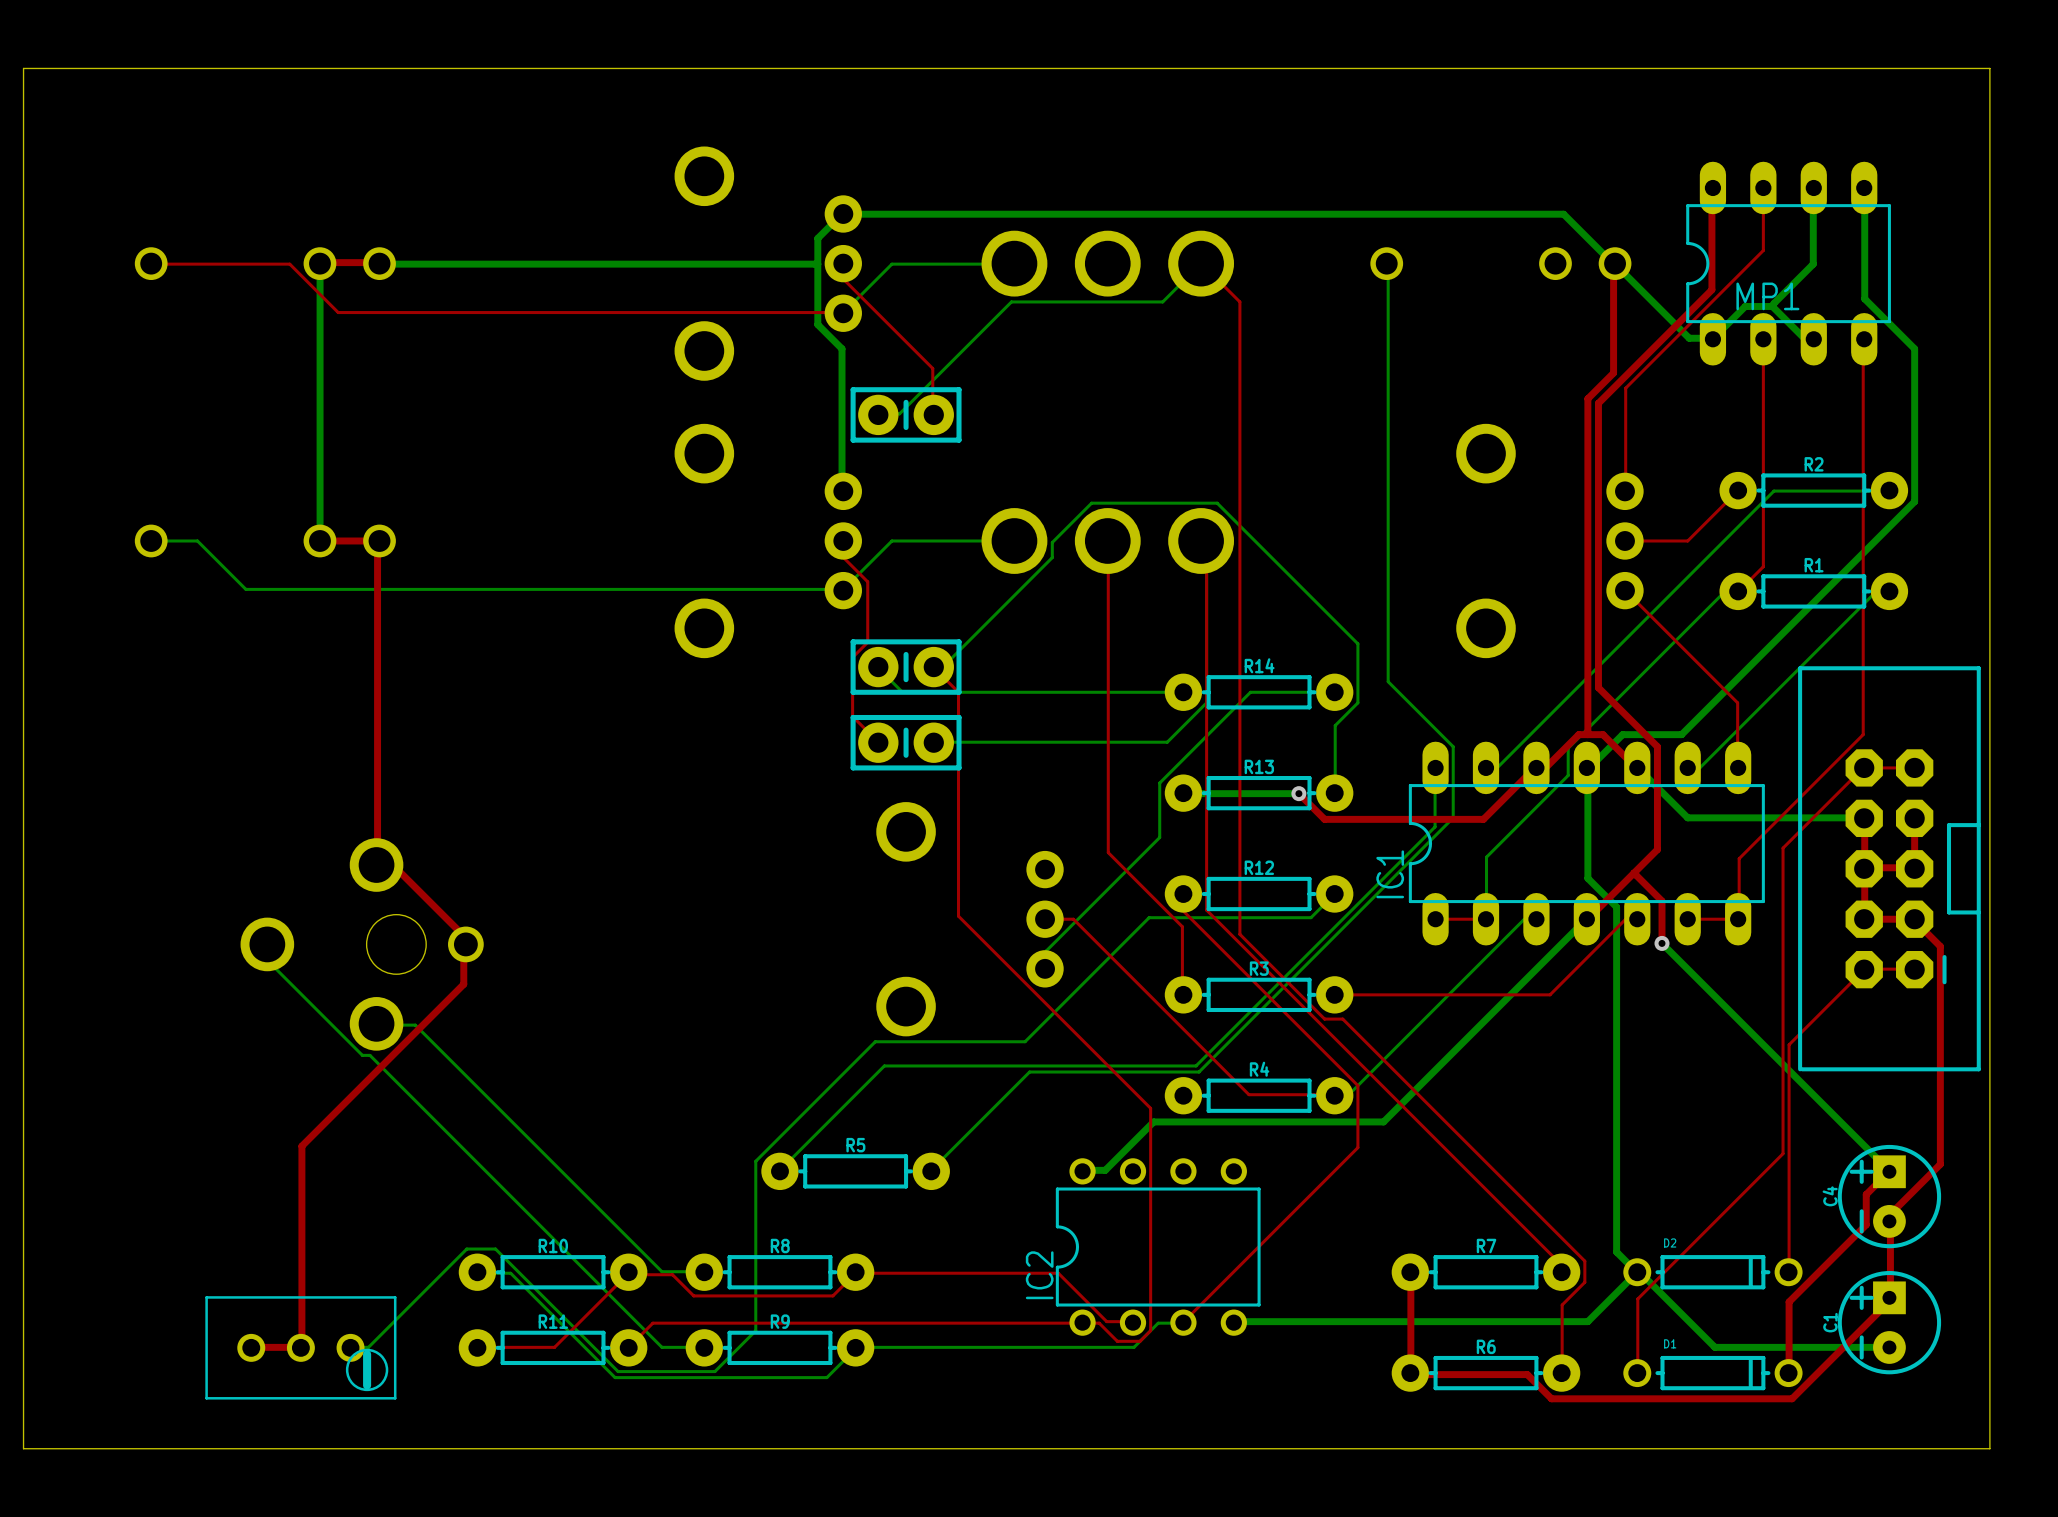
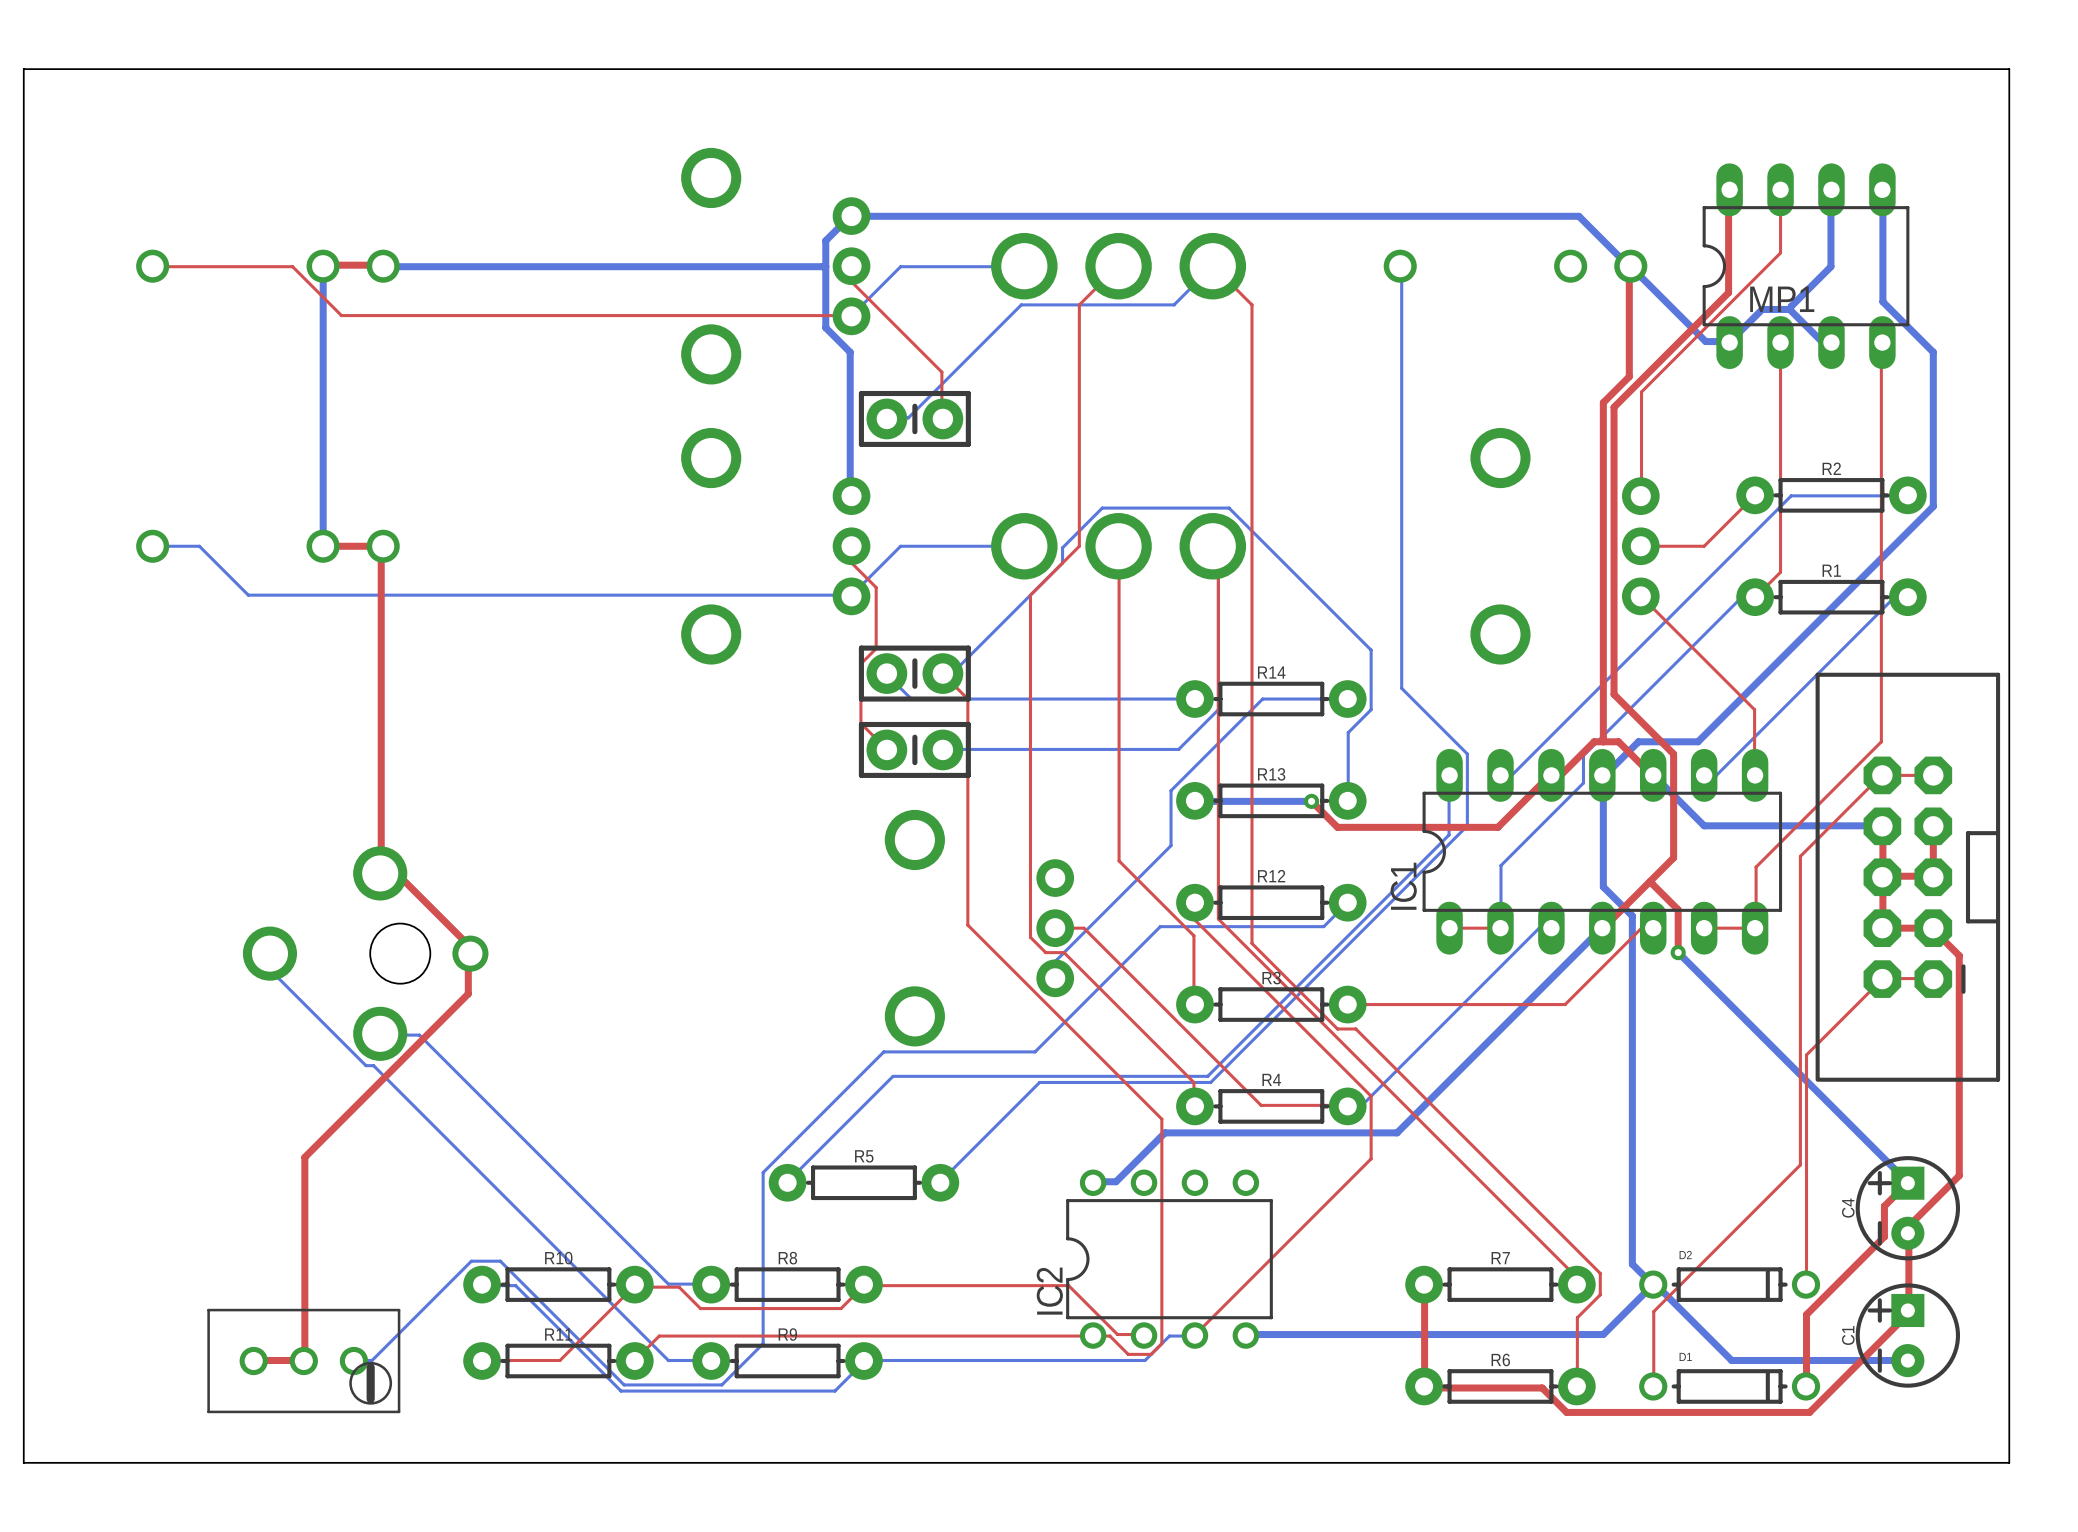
top track: none -> (1118, 266) (1079, 304) (1079, 546) (1030, 595) (1030, 937) (1045, 952) (1064, 952) (1193, 1082) (1194, 1106)

